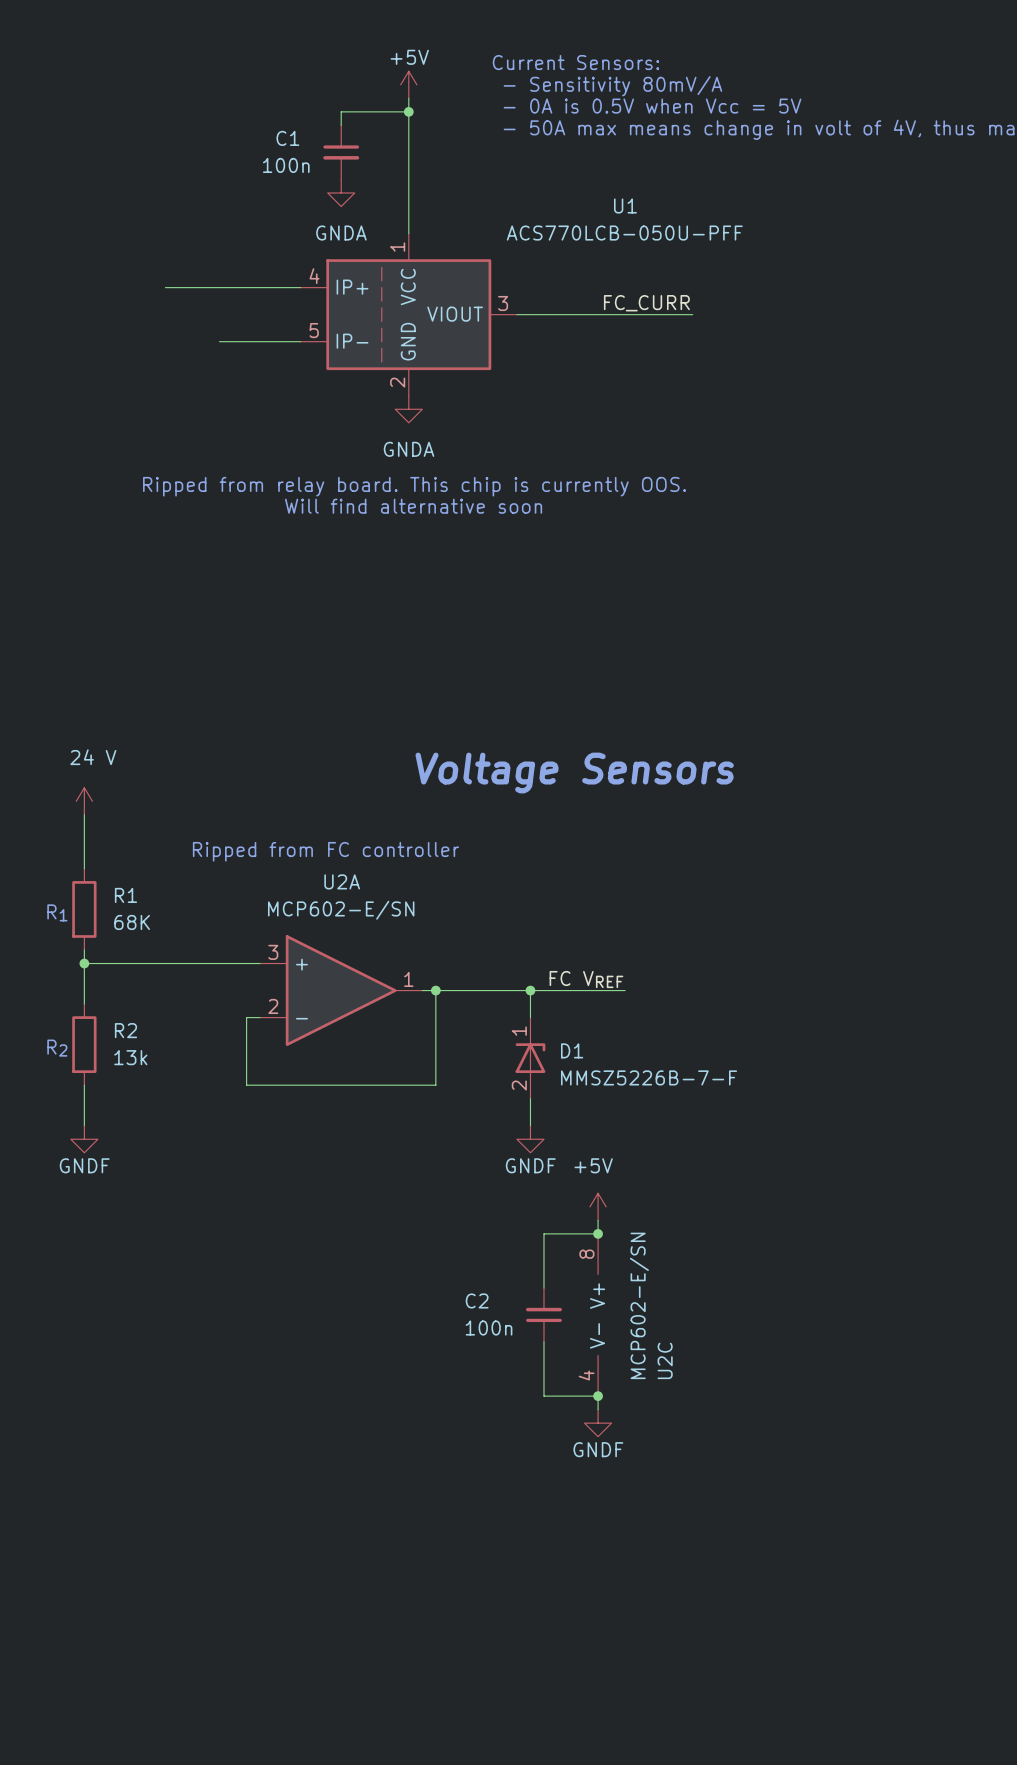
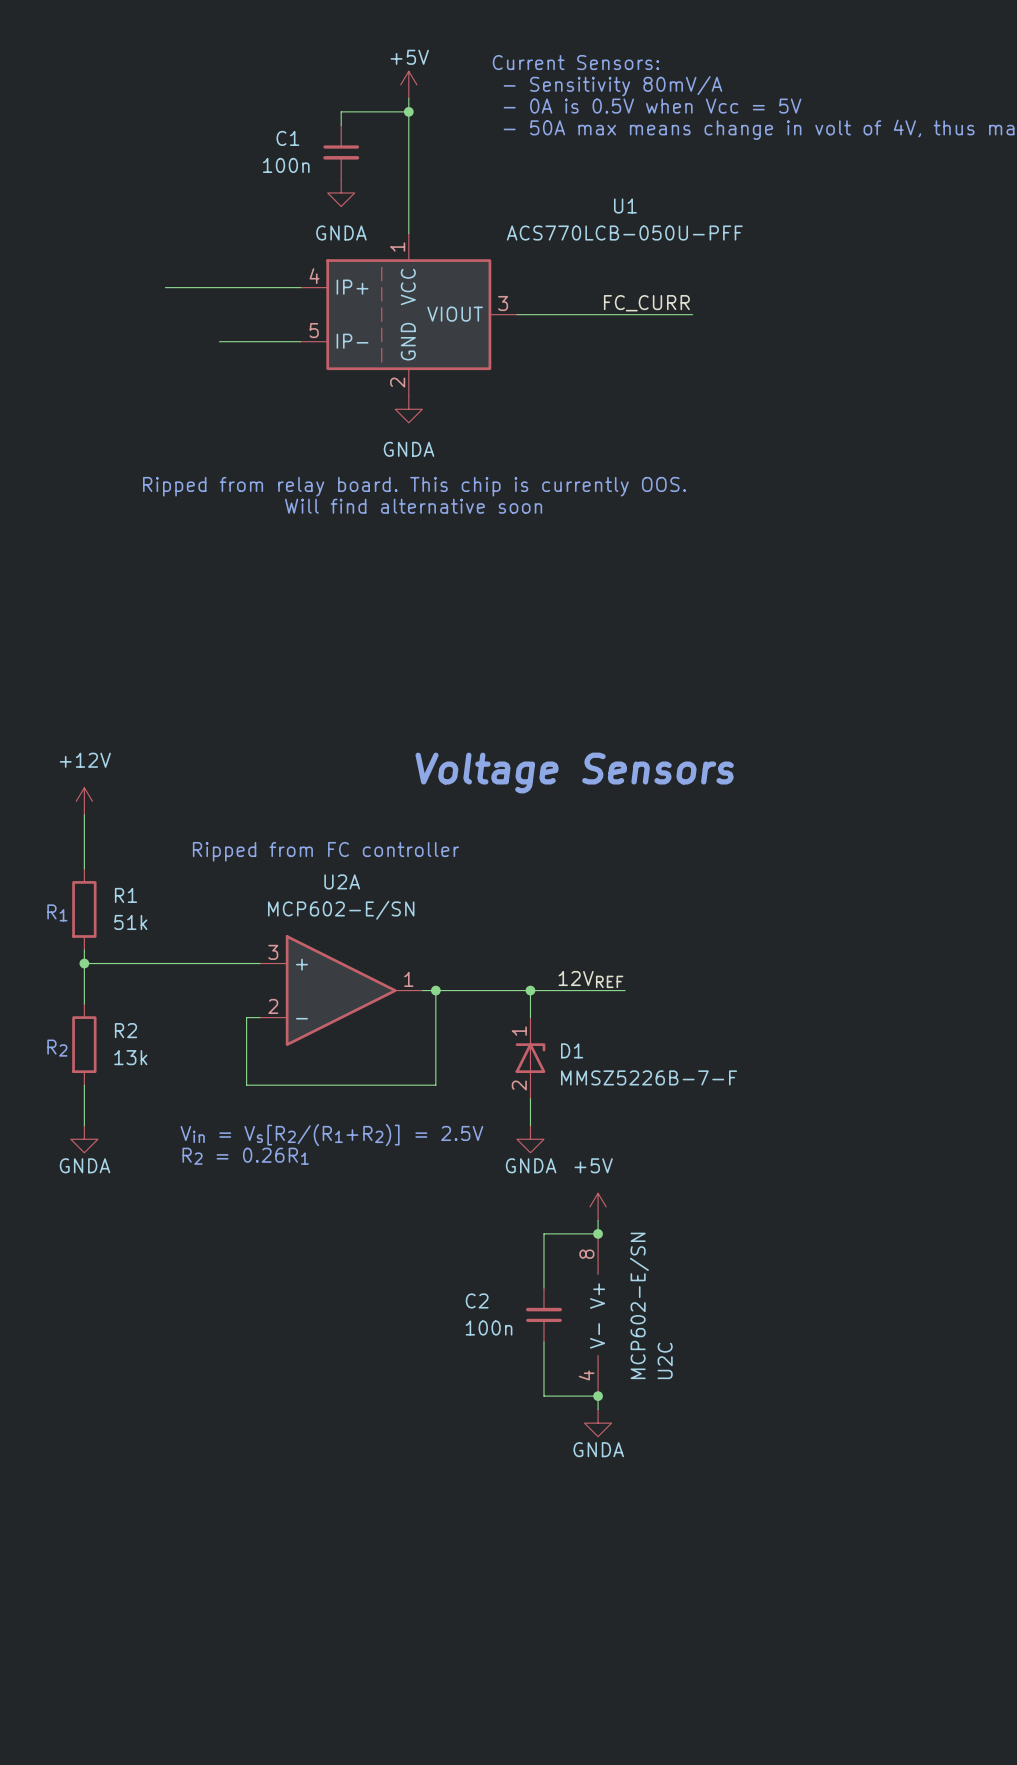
power symbol: 24 V (84, 801) -> +12V (84, 801)
R1 value: 68K (132, 922) -> 51k (130, 922)
label: FC VREF (586, 979) -> 12VREF (590, 979)
text: none -> Vin = Vs[R2/(R1+R2)] = 2.5V (331, 1135)
power symbol: GNDF (84, 1139) -> GNDA (84, 1139)
power symbol: GNDF (530, 1139) -> GNDA (530, 1139)
text: none -> R2 = 0.26R1 (245, 1156)
power symbol: GNDF (598, 1423) -> GNDA (598, 1423)

